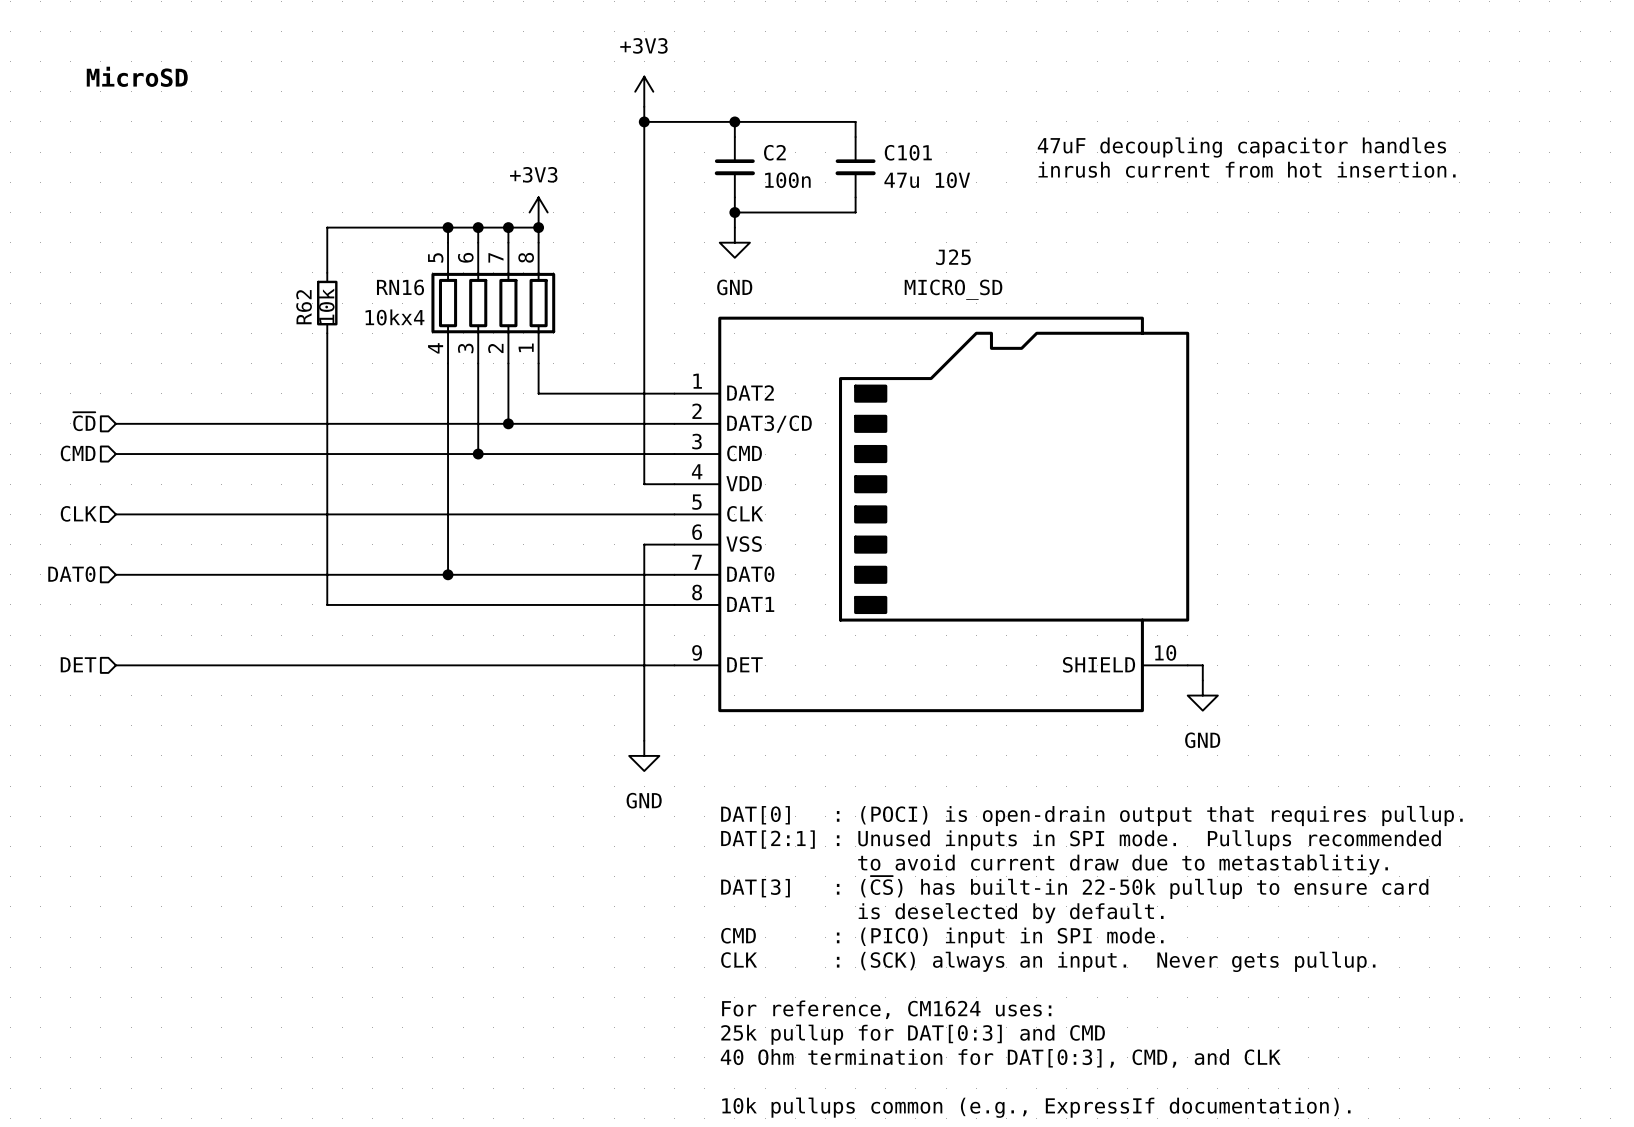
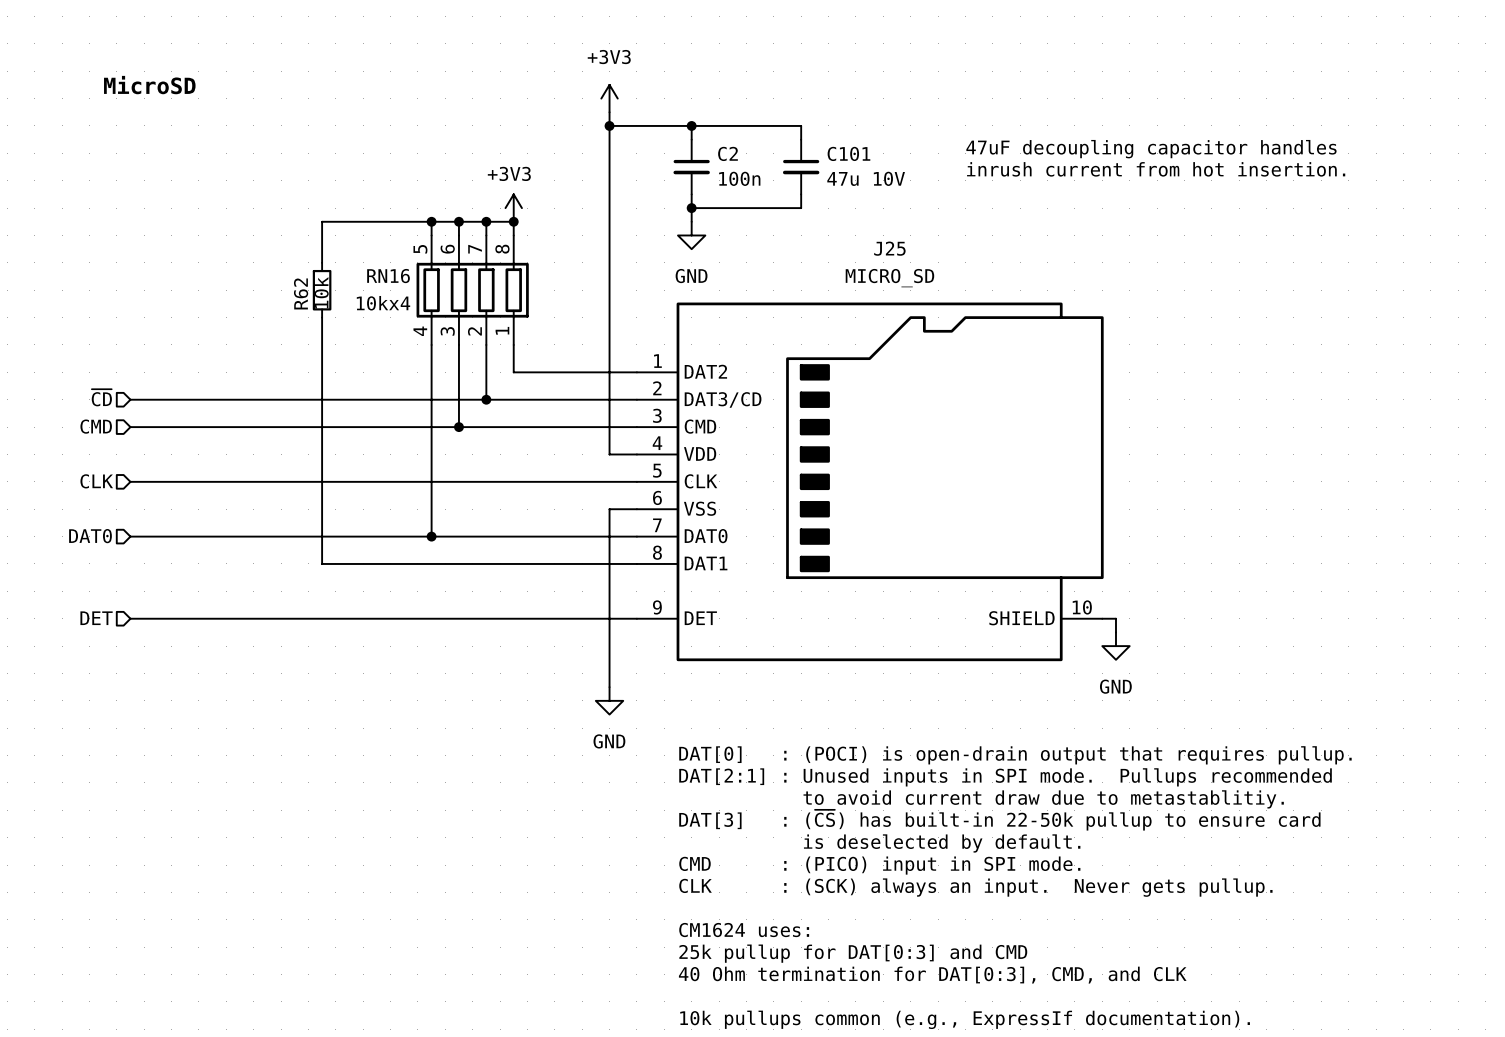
text: For reference, CM1624 uses: (886, 1009) -> CM1624 uses: (744, 930)

